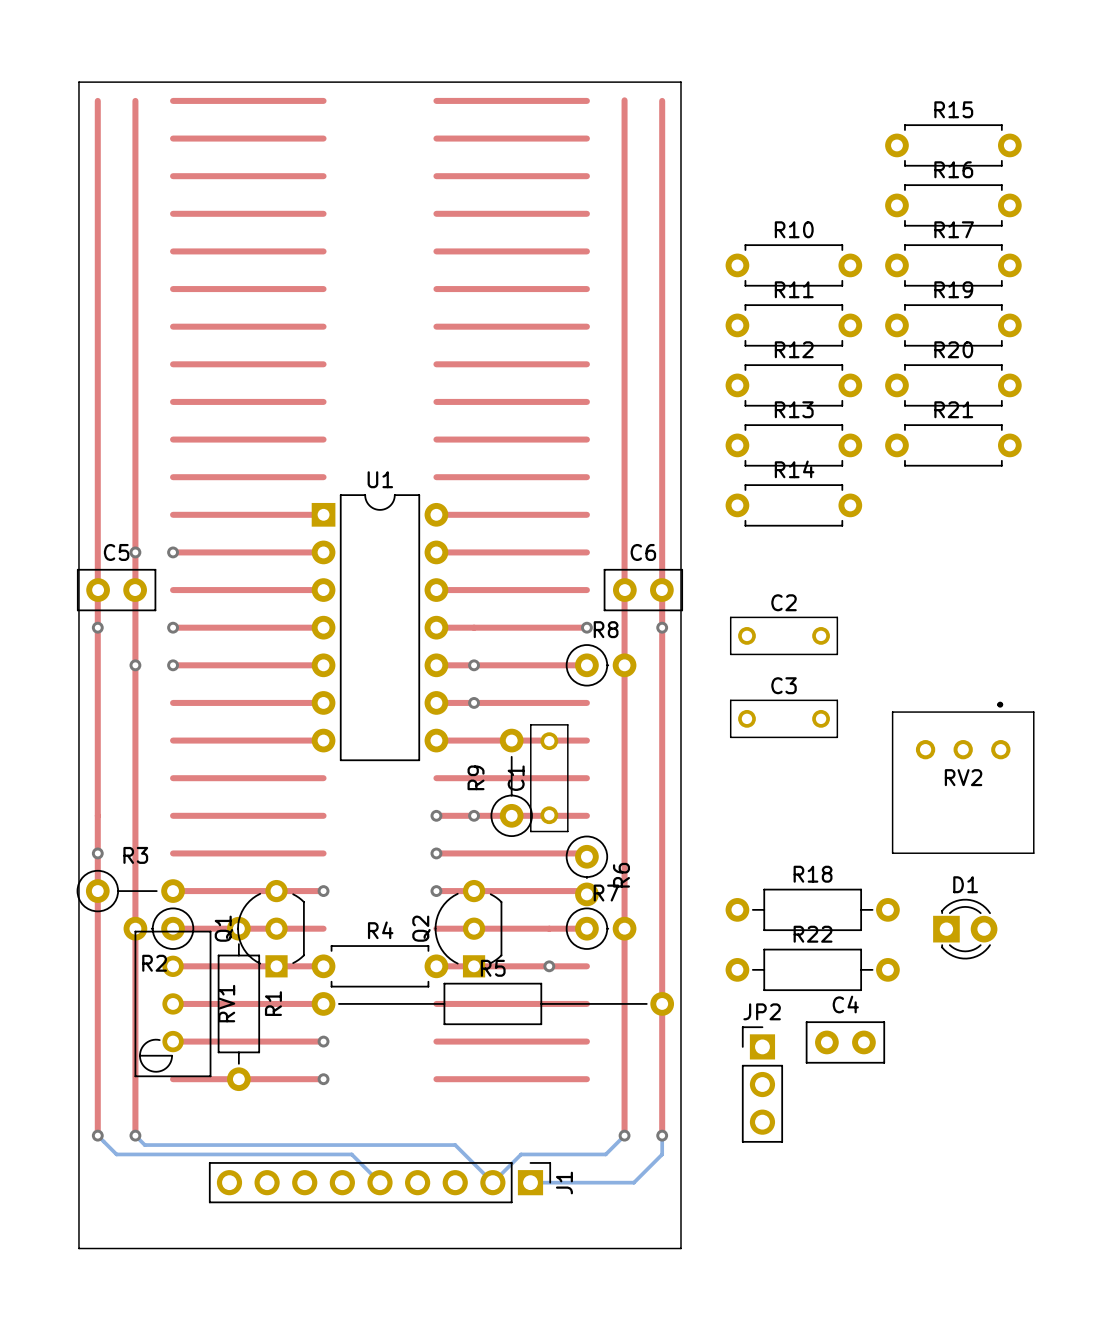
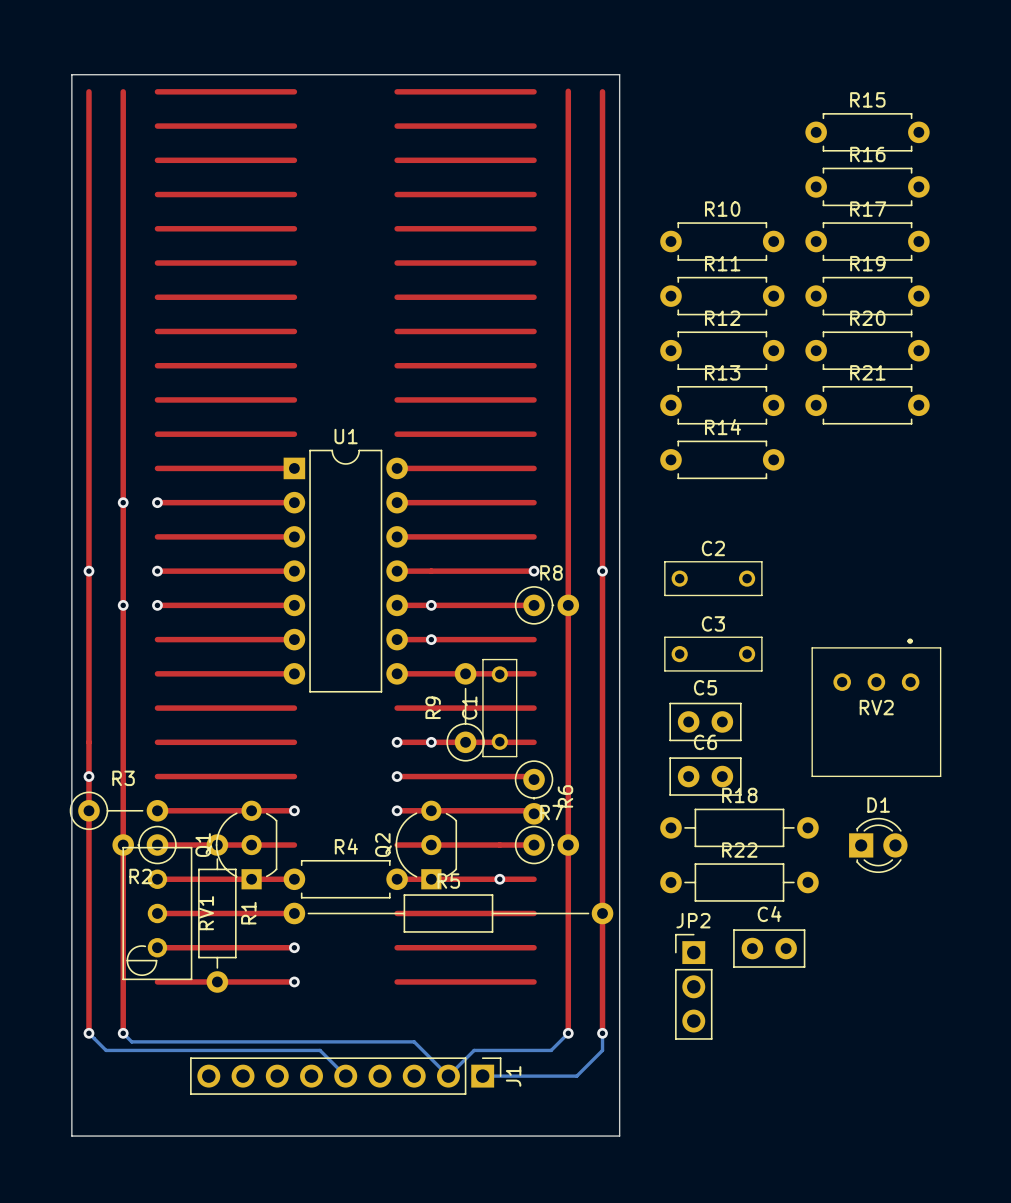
C5 position: (116, 590) -> (705, 721)
C6 position: (643, 590) -> (705, 776)

